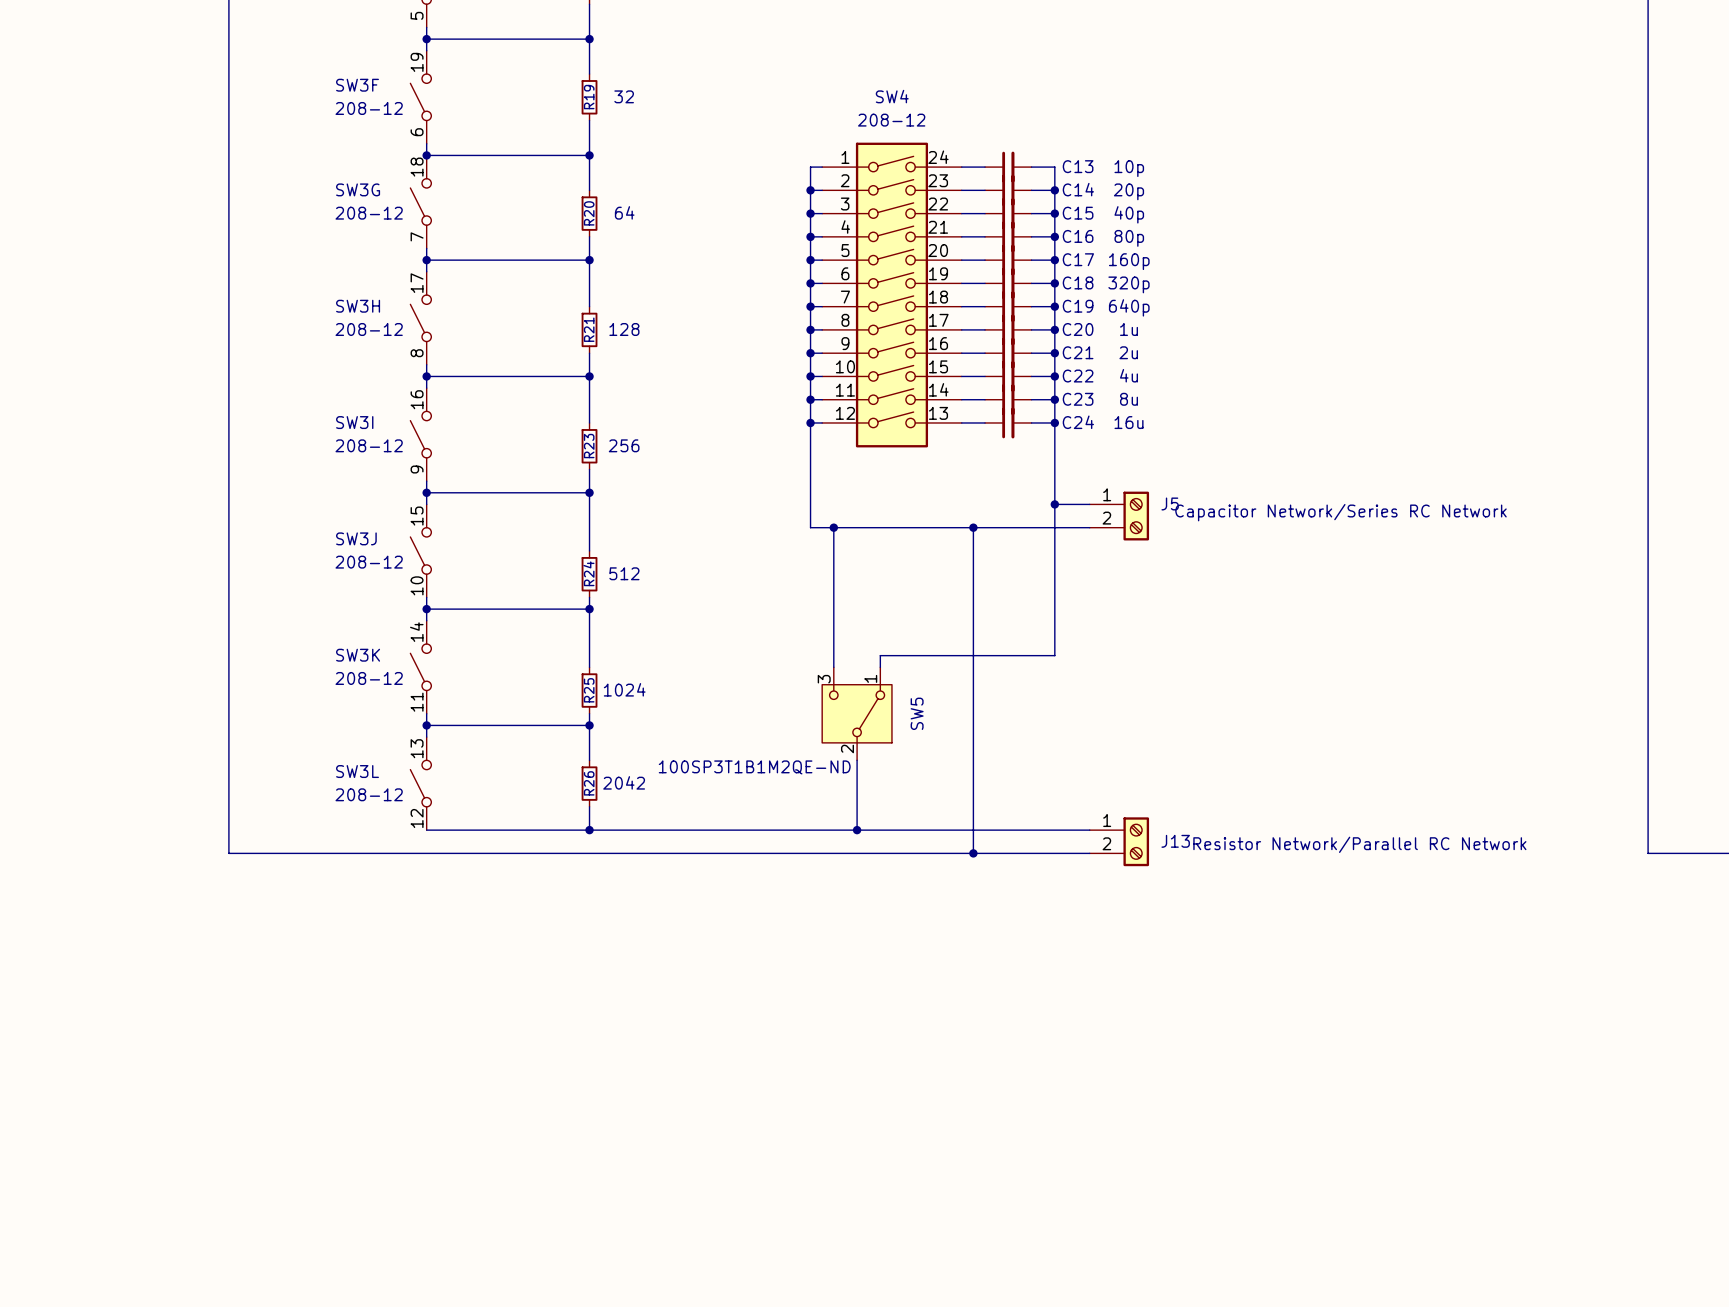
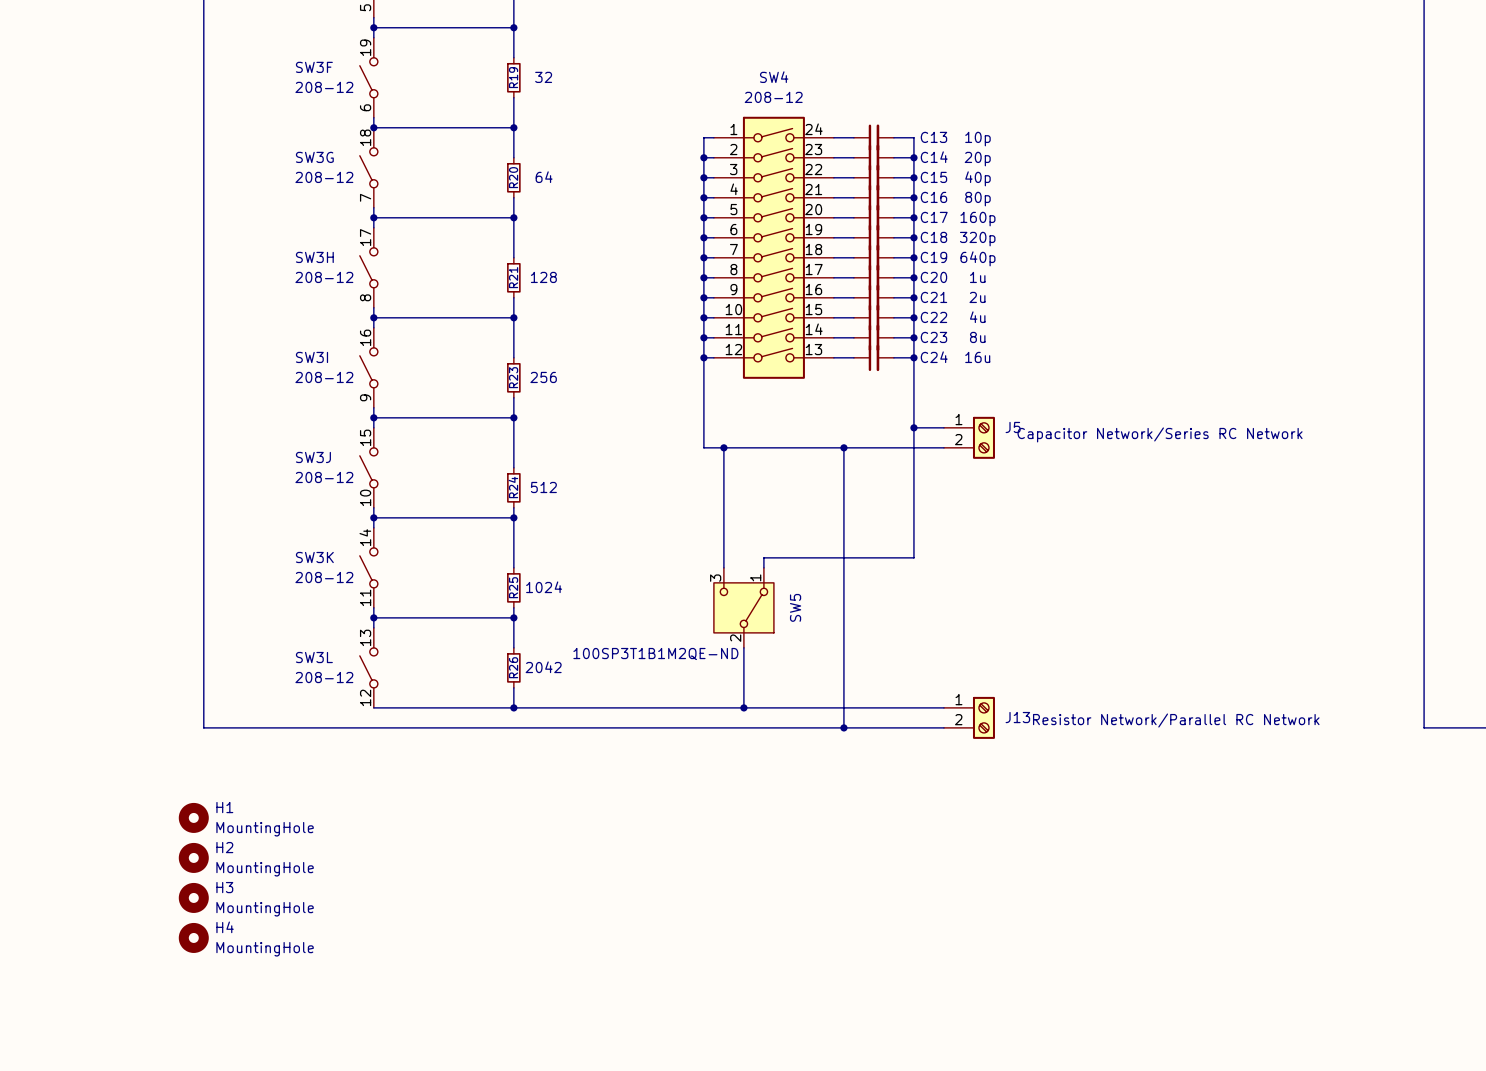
H1: none -> MountingHole (193, 817)
H2: none -> MountingHole (193, 857)
H3: none -> MountingHole (193, 897)
H4: none -> MountingHole (193, 937)

